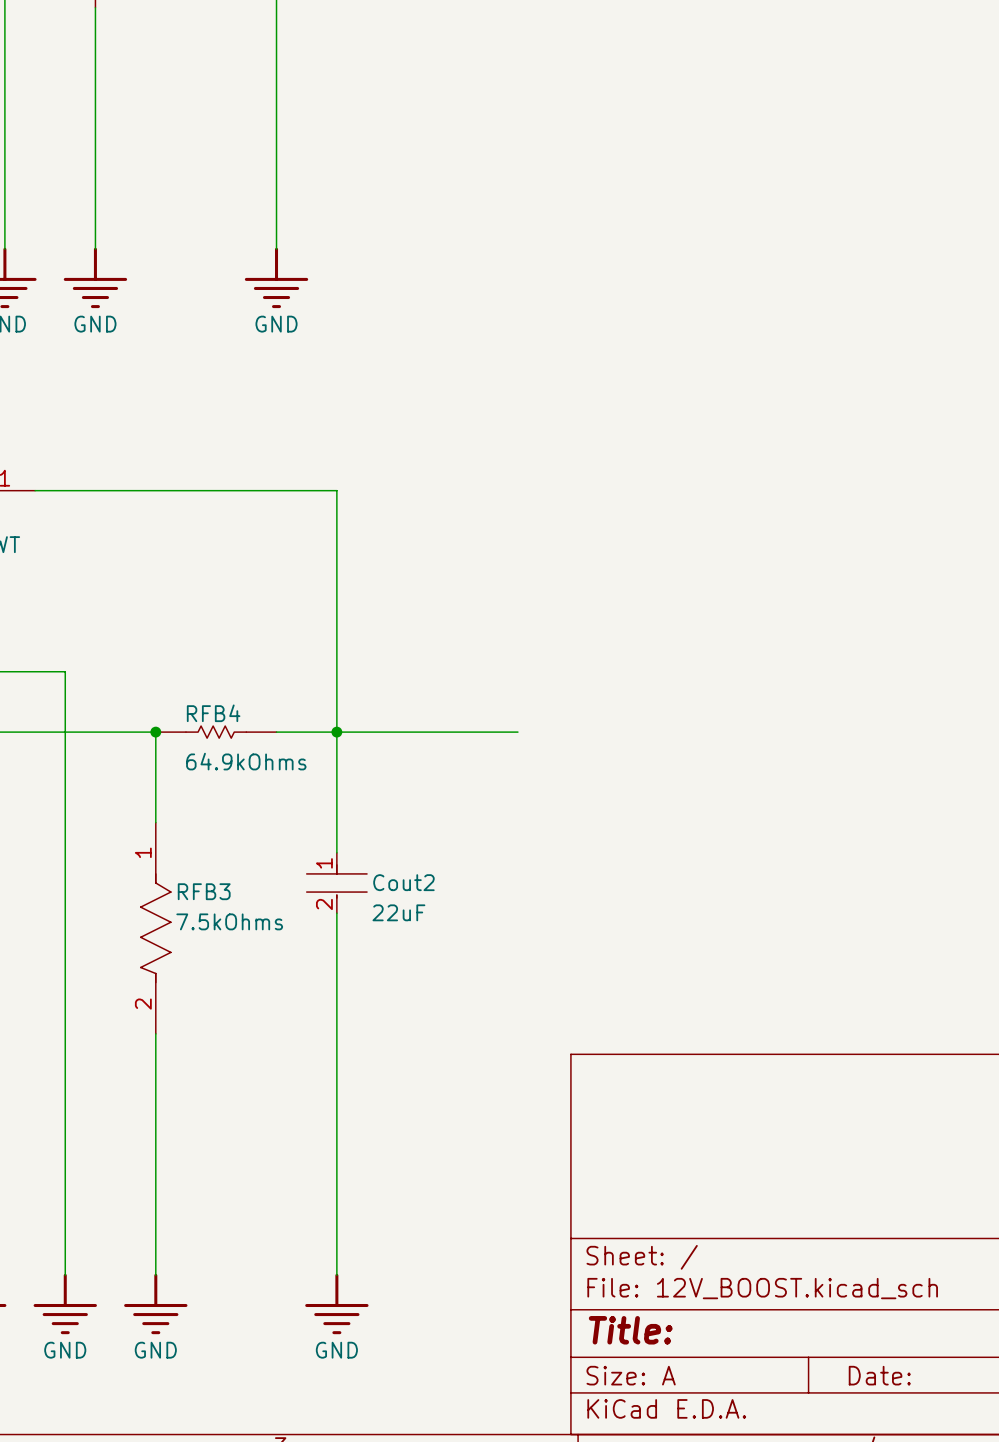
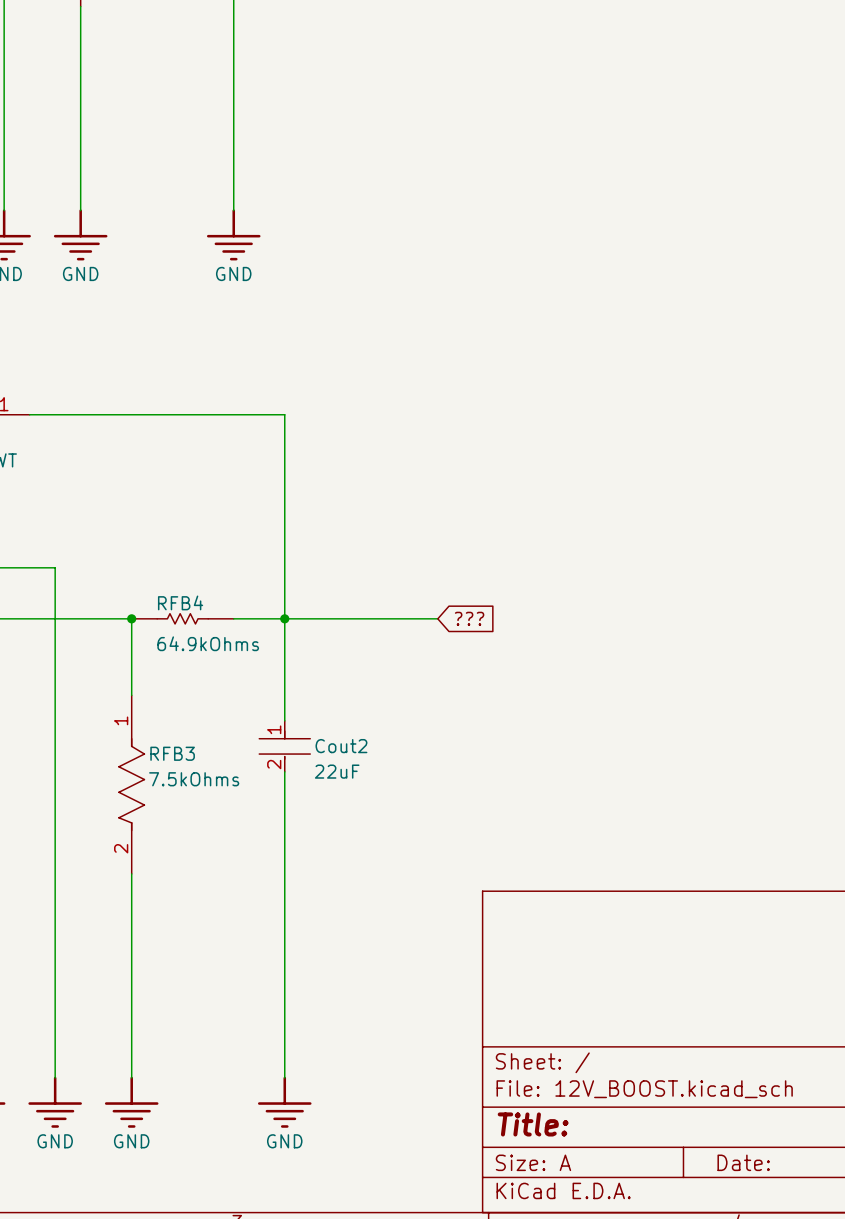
global label: none -> ??? (469, 618)

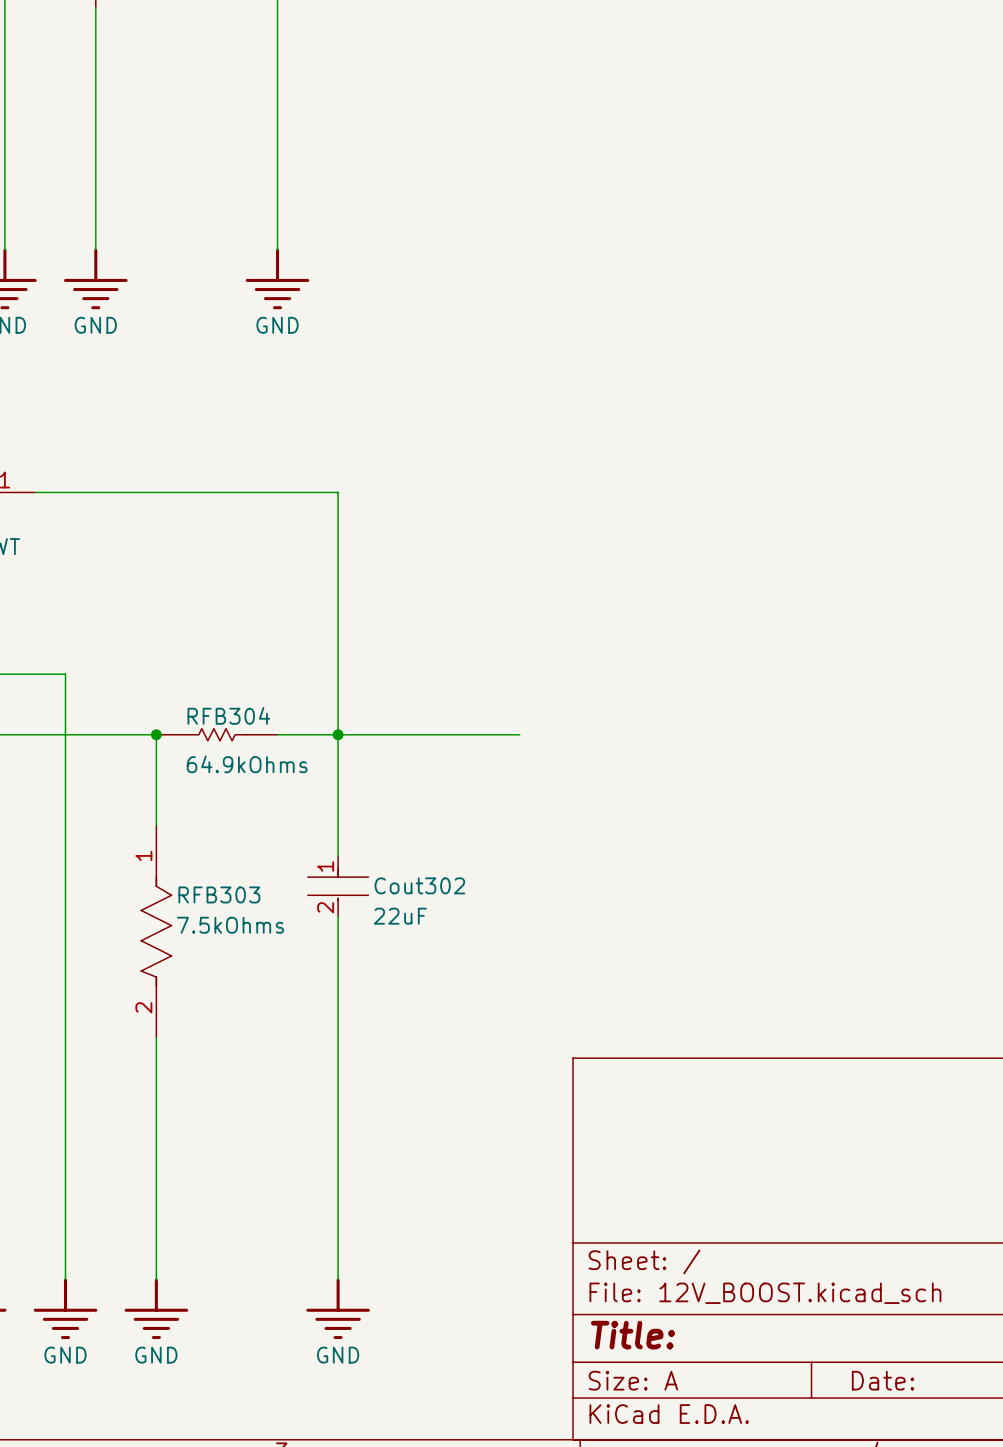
RFB4 name: RFB4 (180, 602) -> RFB304 (228, 715)
global label: ??? (469, 618) -> none
Cout2 name: Cout2 (341, 746) -> Cout302 (419, 885)
RFB3 name: RFB3 (172, 753) -> RFB303 (219, 894)

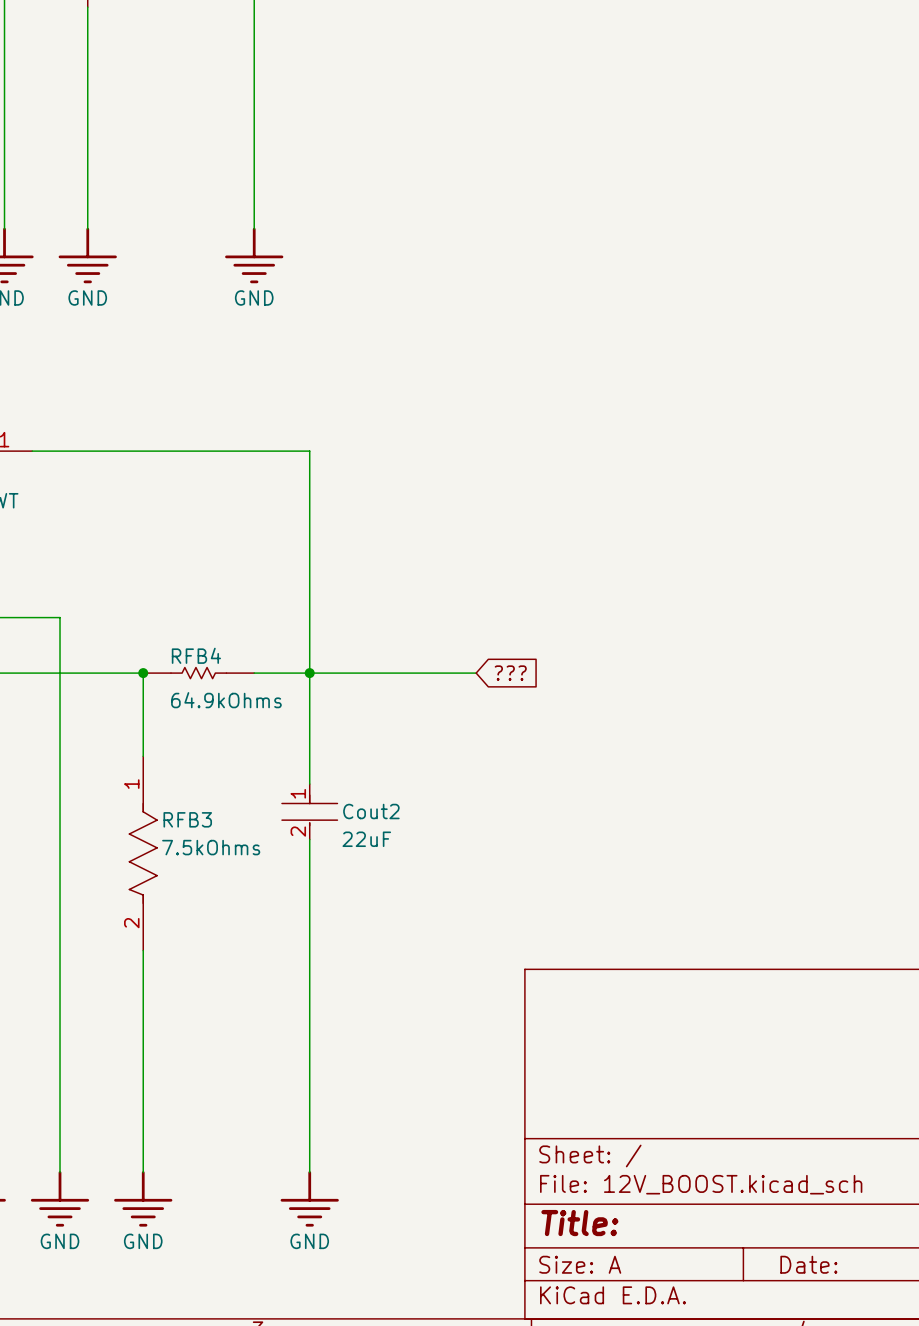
RFB304 name: RFB304 (228, 715) -> RFB4 (196, 655)
global label: none -> ??? (510, 673)
Cout302 name: Cout302 (419, 885) -> Cout2 (371, 811)
RFB303 name: RFB303 (219, 894) -> RFB3 (187, 819)

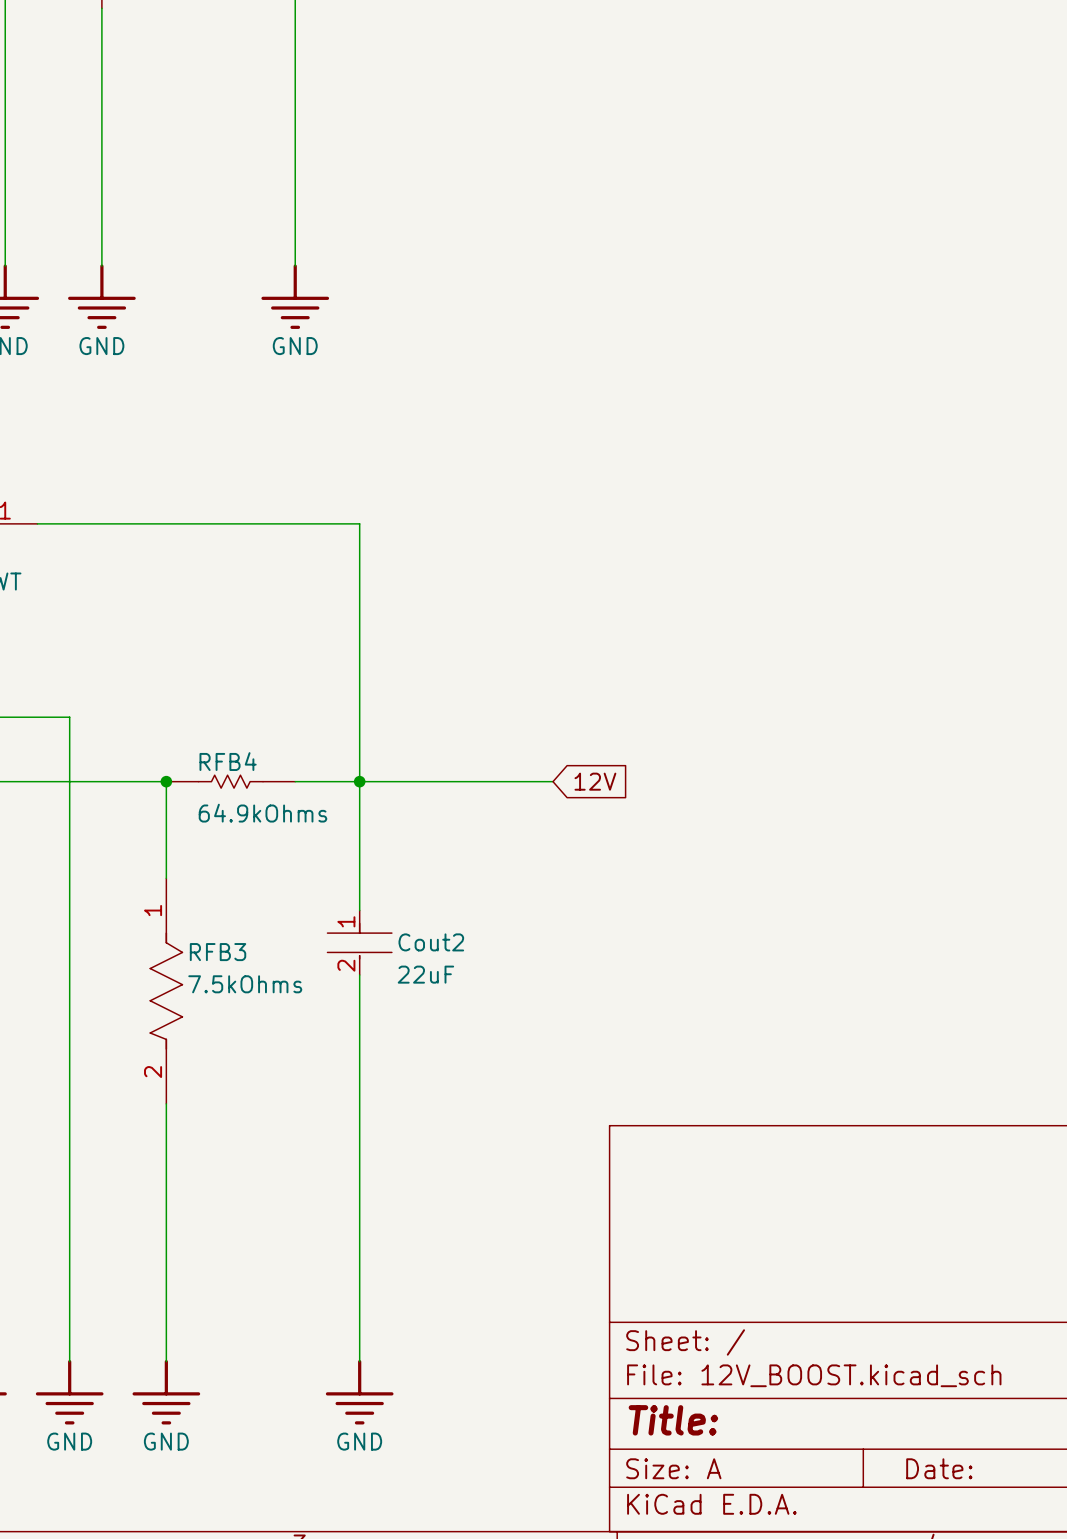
global label: ??? (510, 673) -> 12V (595, 781)

